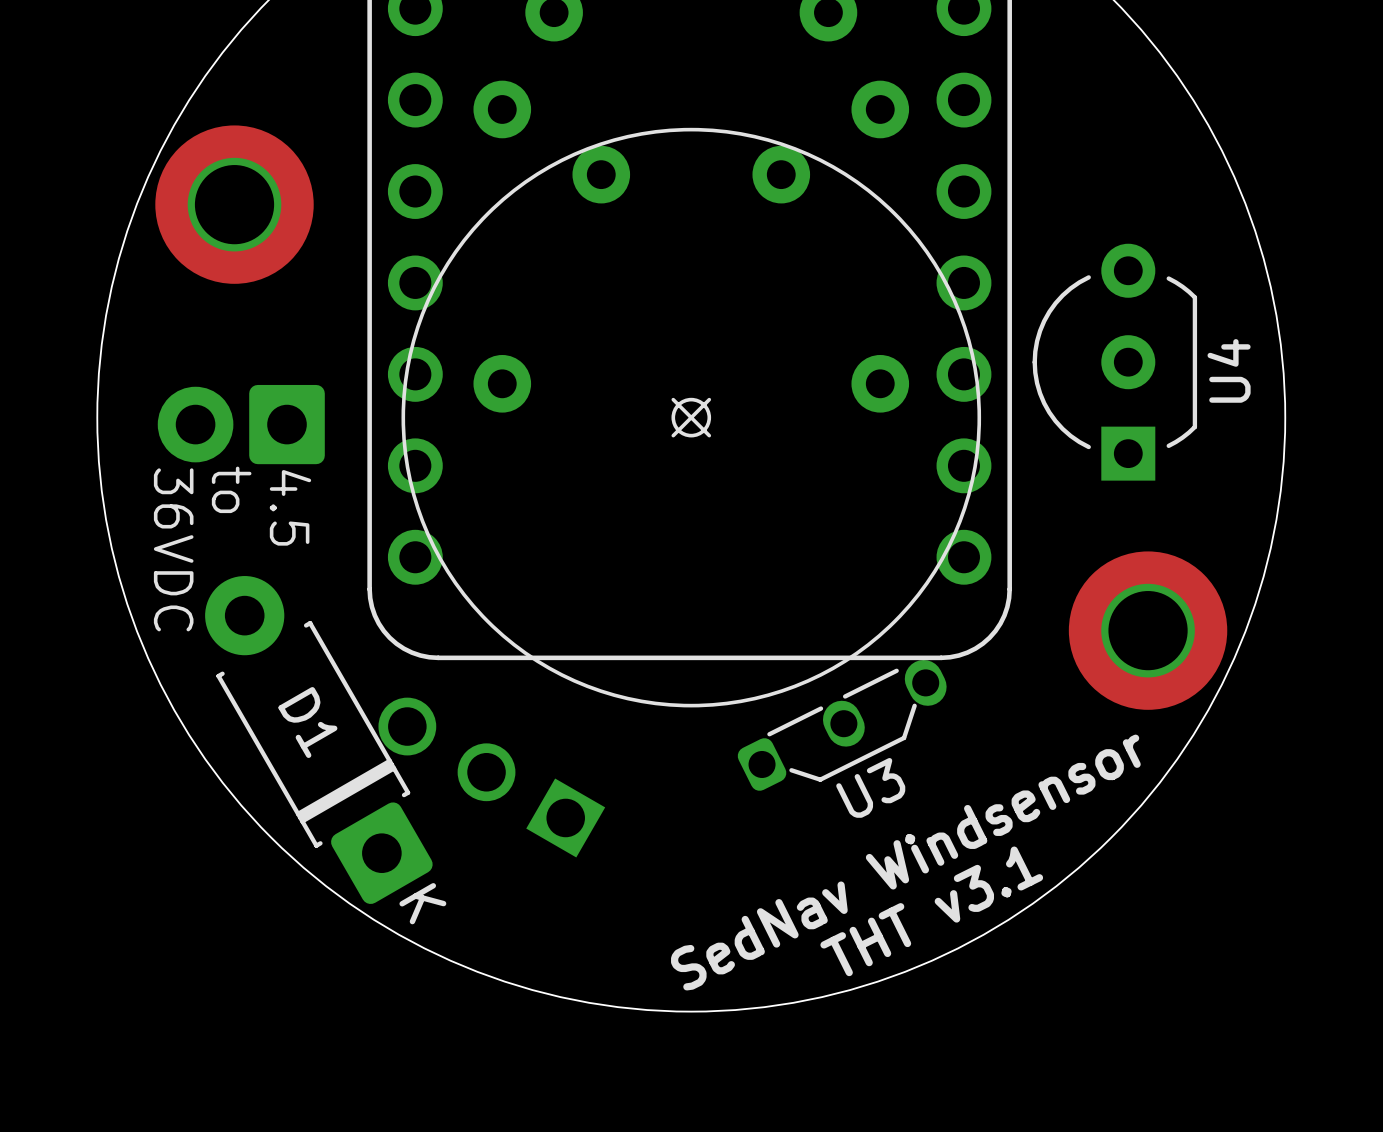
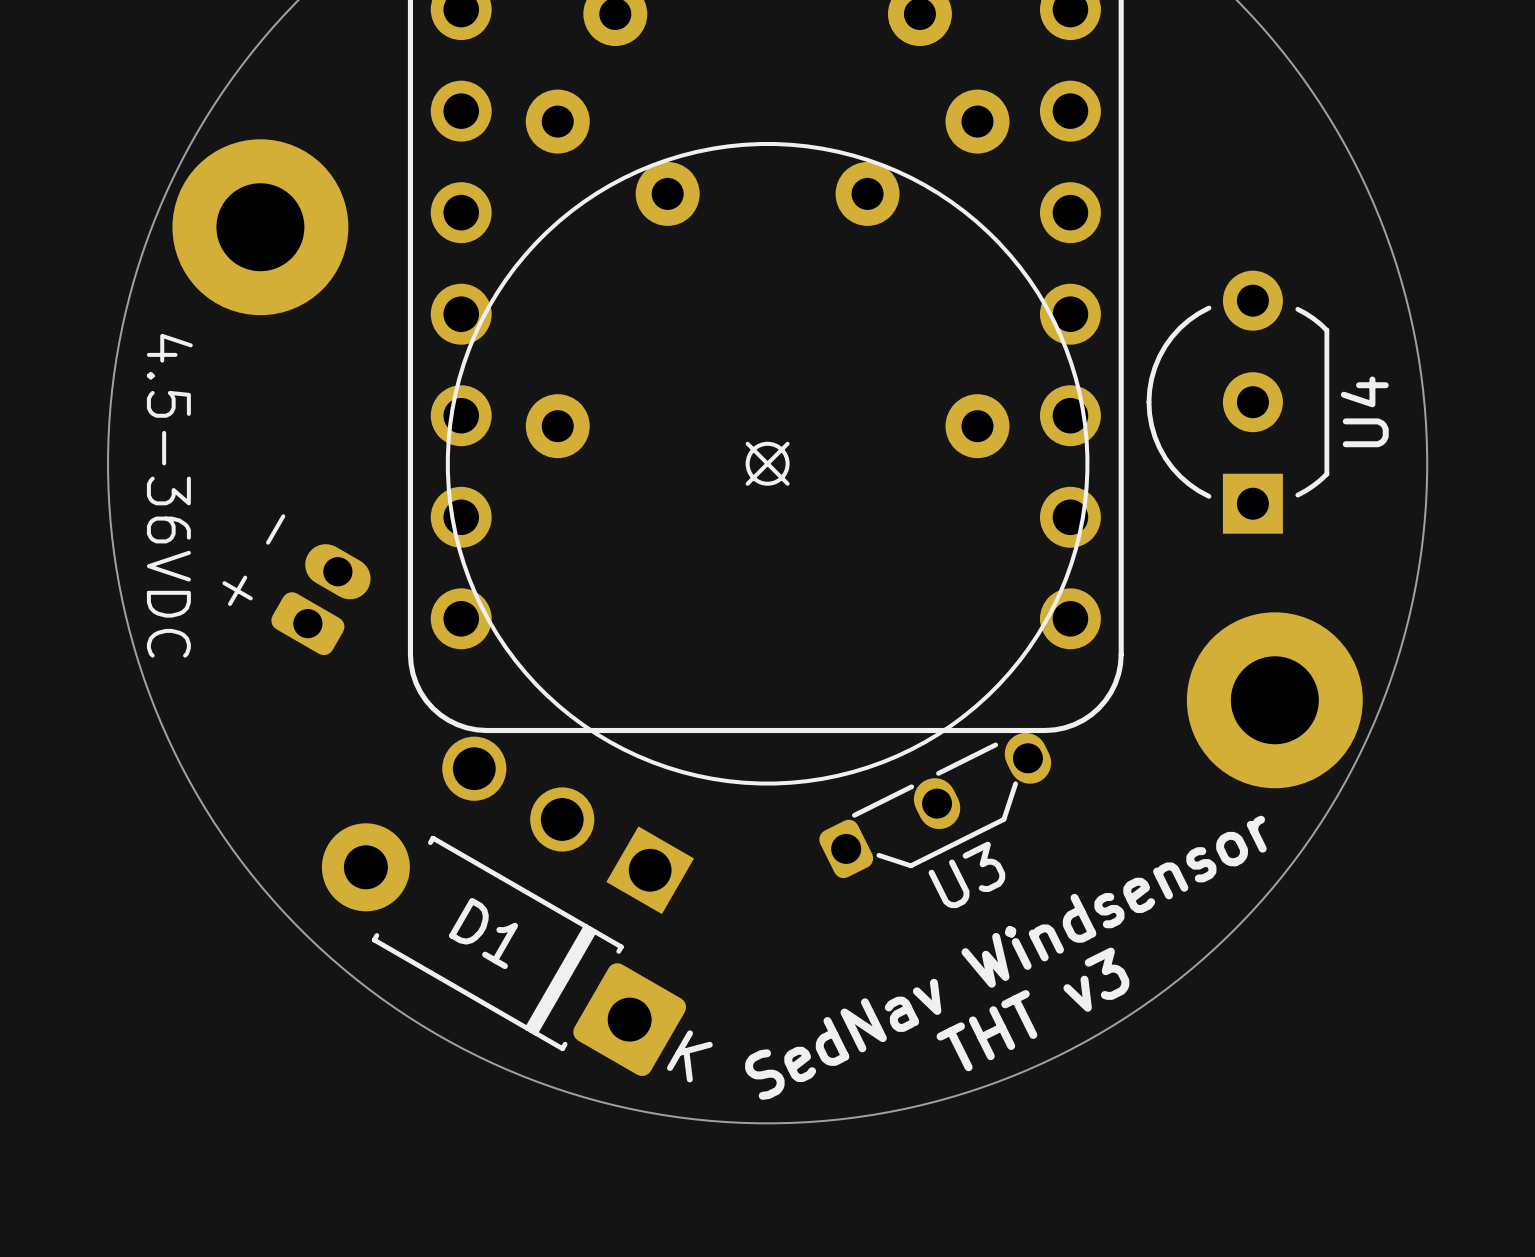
part: (241, 424) -> none
text: none -> - (275, 529)
text: to (231, 489) -> none
text: 4.5 (290, 507) -> none
text: none -> + (237, 590)
part: none -> (320, 599)
text: 36VDC (173, 549) -> 4.5-36VDC (169, 495)
D1 footprint: [205, 576, 433, 904] -> [321, 823, 687, 1077]
part position: (491, 777) -> (568, 825)
text: THT v3.1 (931, 911) -> THT v3 (1032, 1009)

